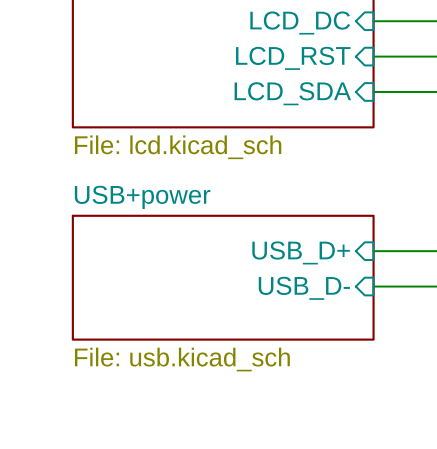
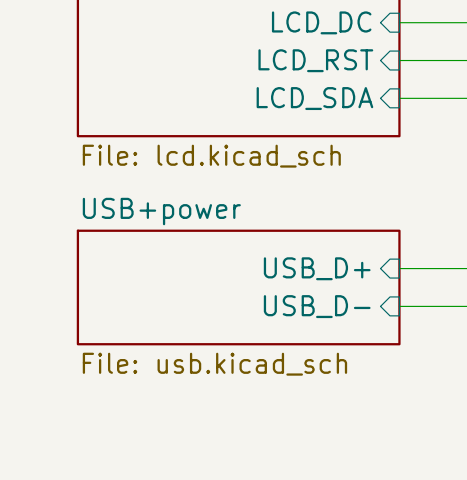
sheet USB+power shape: [71, 214, 375, 341] -> [76, 229, 401, 346]

